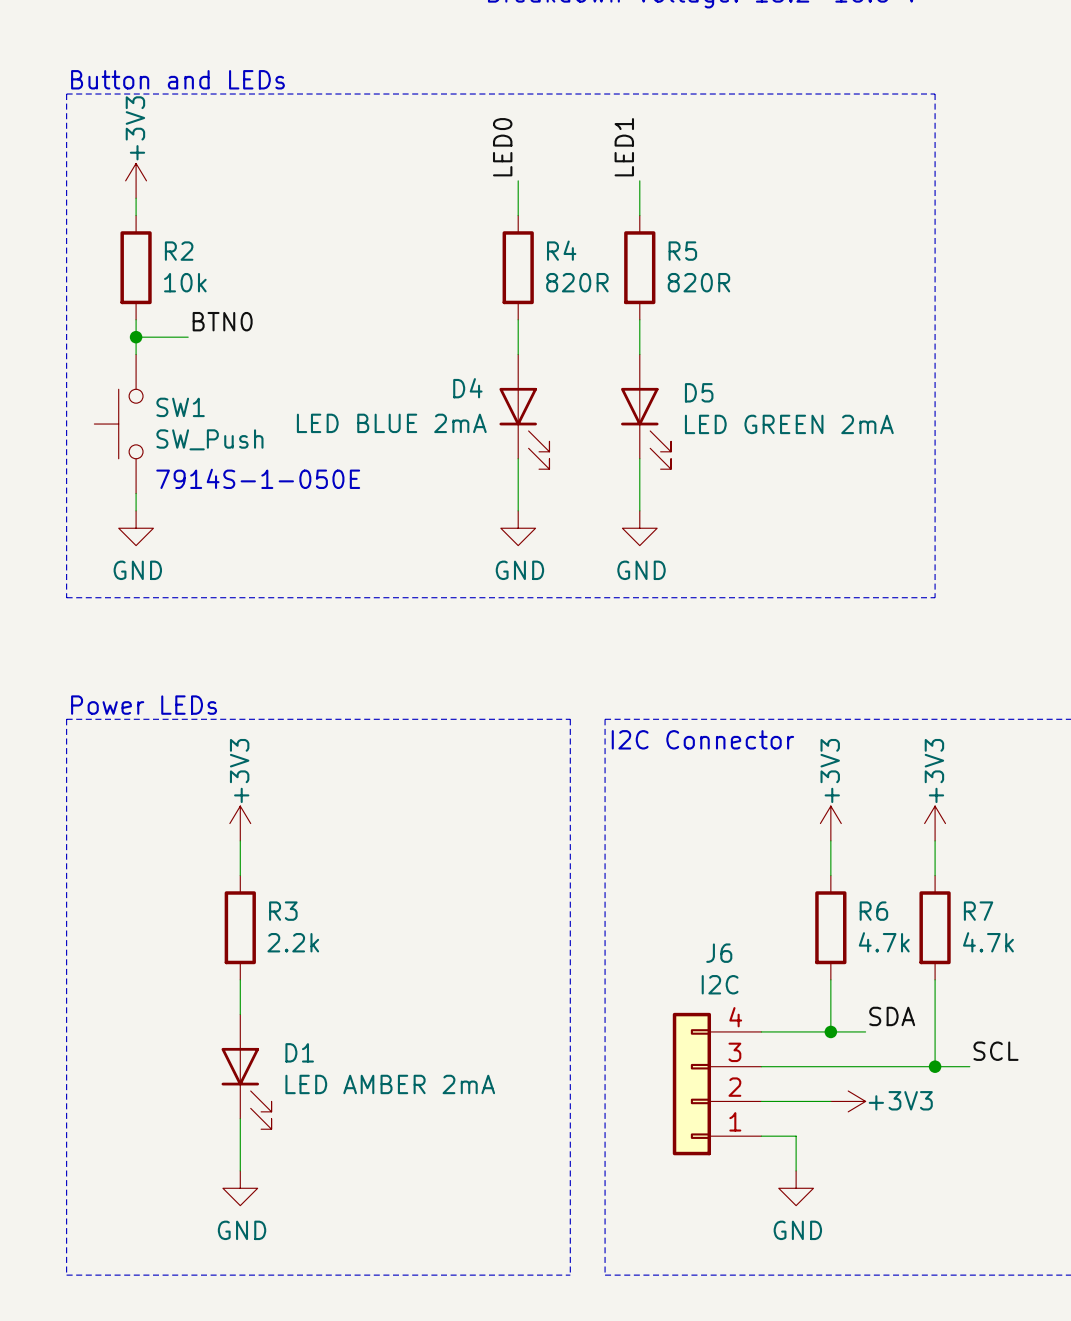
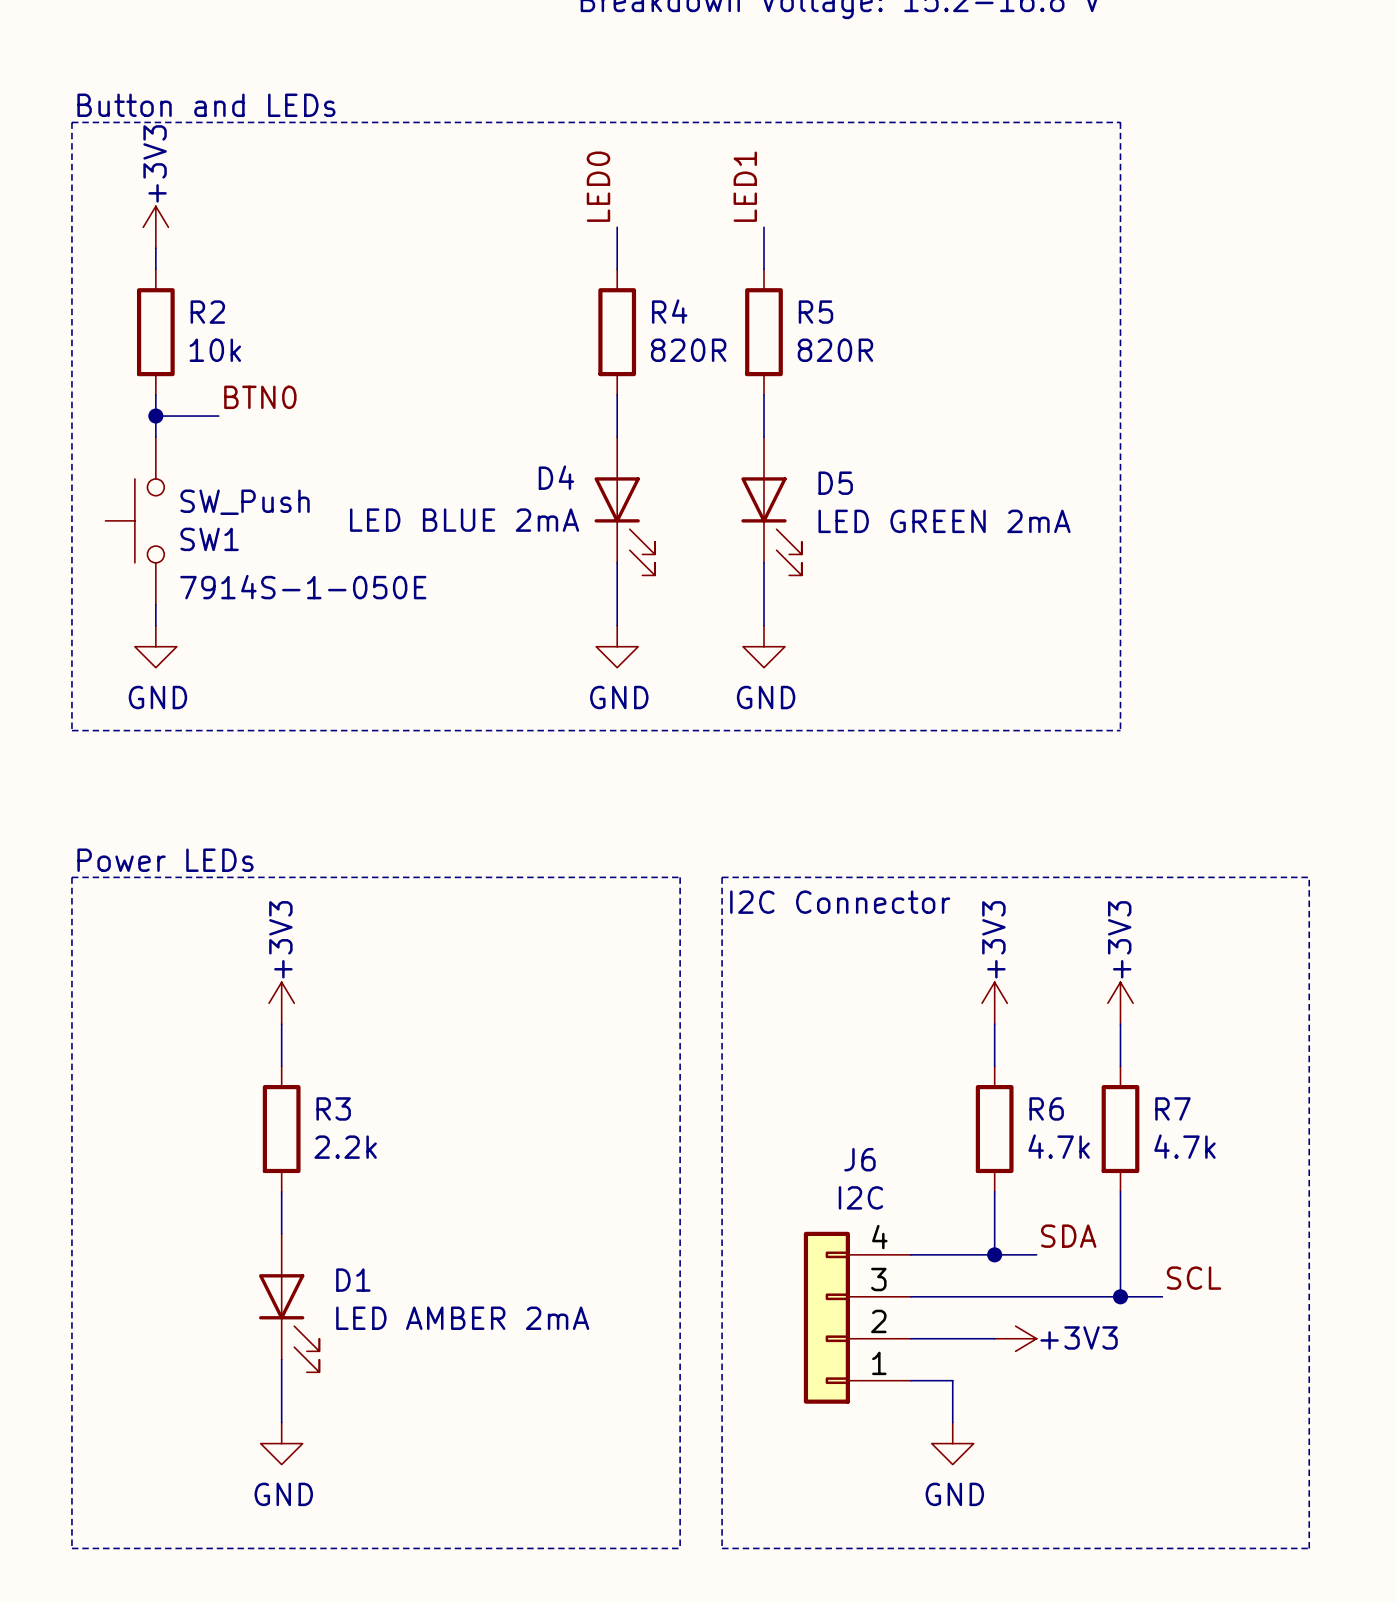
SW1 name position: SW1 (180, 407) -> SW1 (209, 539)
SW1 value position: SW_Push (209, 439) -> SW_Push (245, 502)

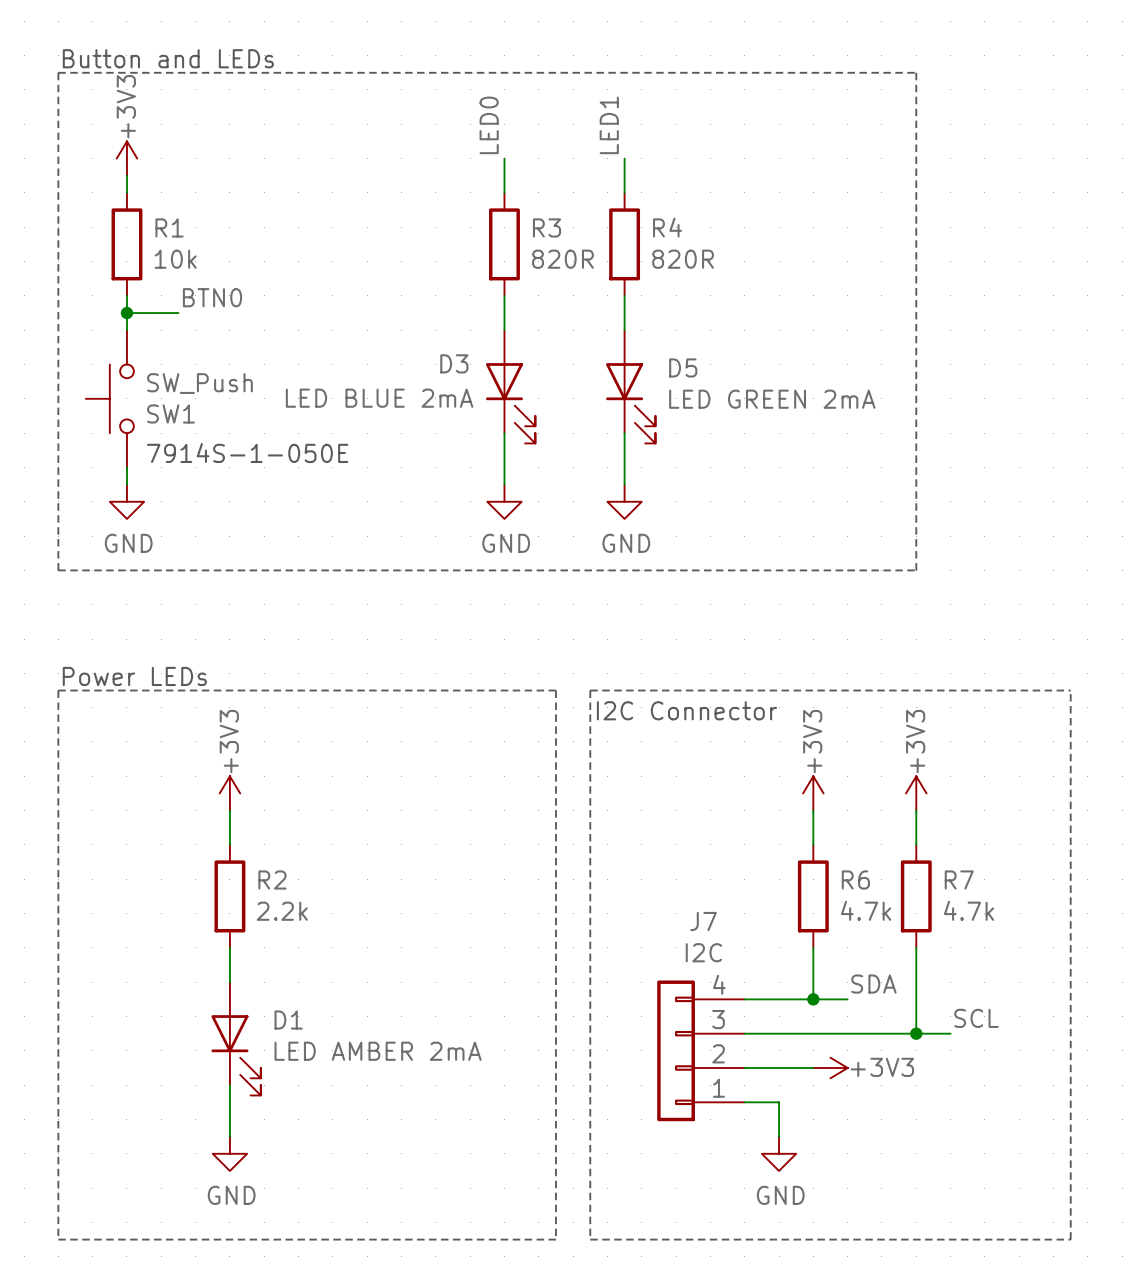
R4 name: R4 (669, 311) -> R3 (547, 227)
R2 name: R2 (207, 312) -> R1 (169, 227)
R5 name: R5 (815, 312) -> R4 (667, 227)
D4 name: D4 (556, 477) -> D3 (454, 363)
R3 name: R3 (333, 1108) -> R2 (272, 879)
J6 name: J6 (859, 1159) -> J7 (703, 921)

